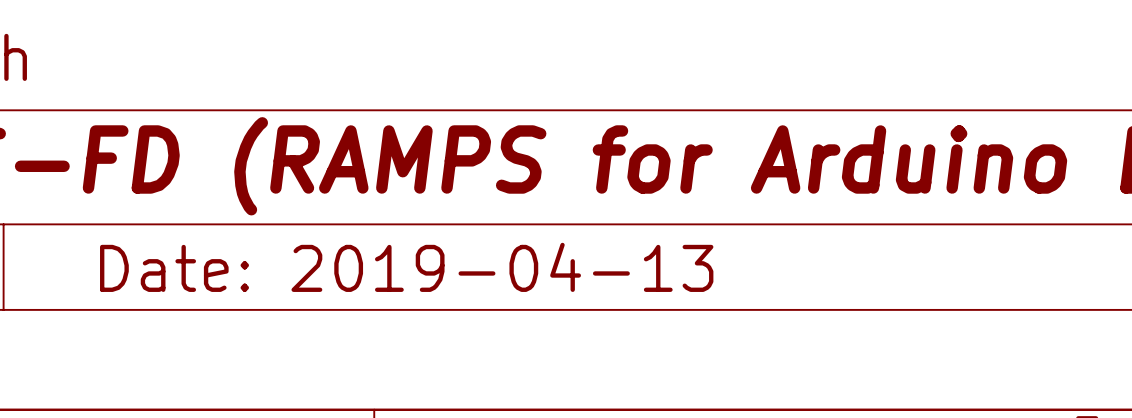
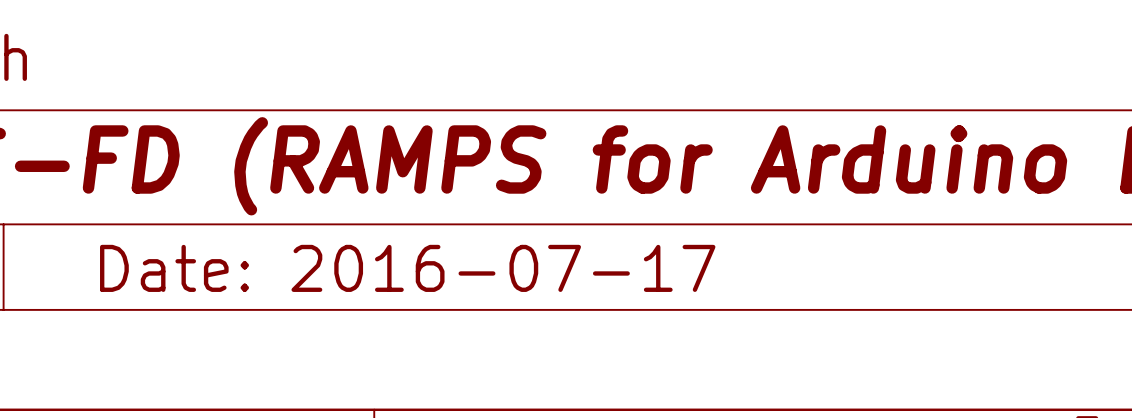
title block: Date: 2019-04-13 (406, 267) -> Date: 2016-07-17 (407, 268)

